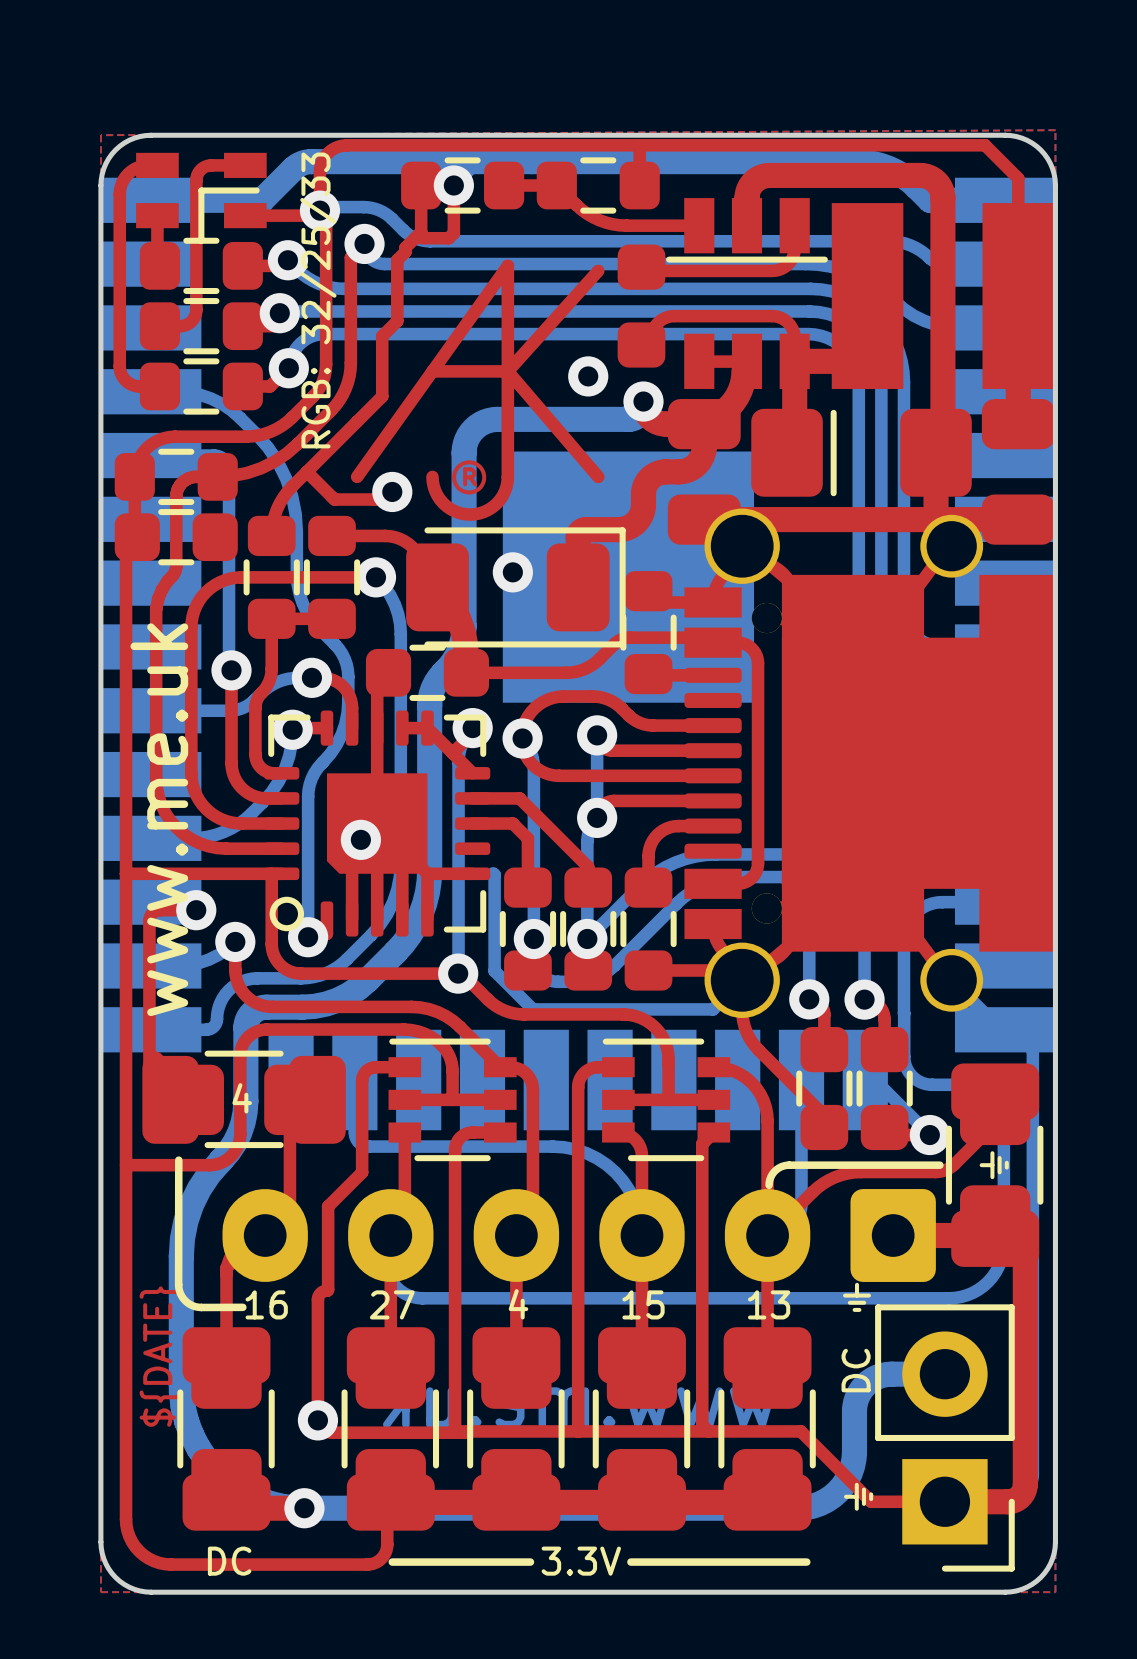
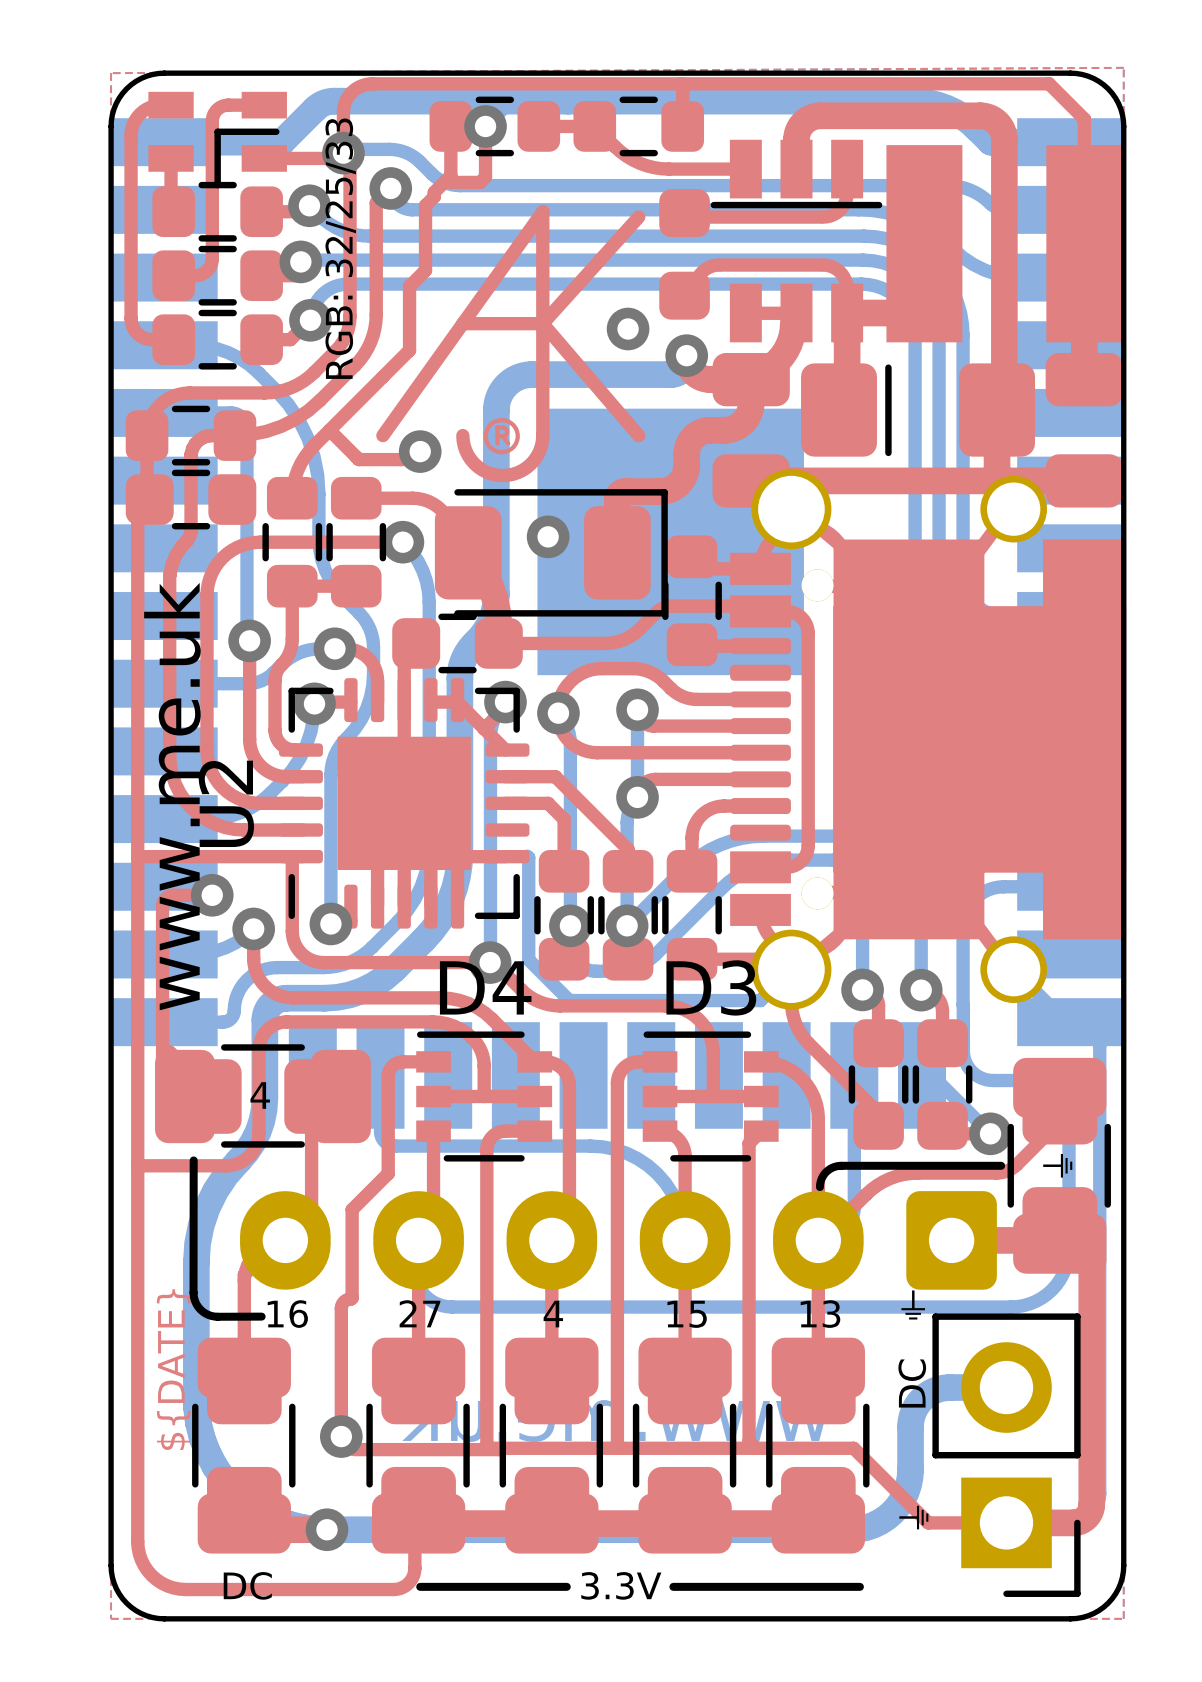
part: (377, 823) -> none
U2: none -> (404, 803)
via: (360, 839) -> none
D4 name: none -> D4 (485, 987)
D3 name: none -> D3 (711, 987)

